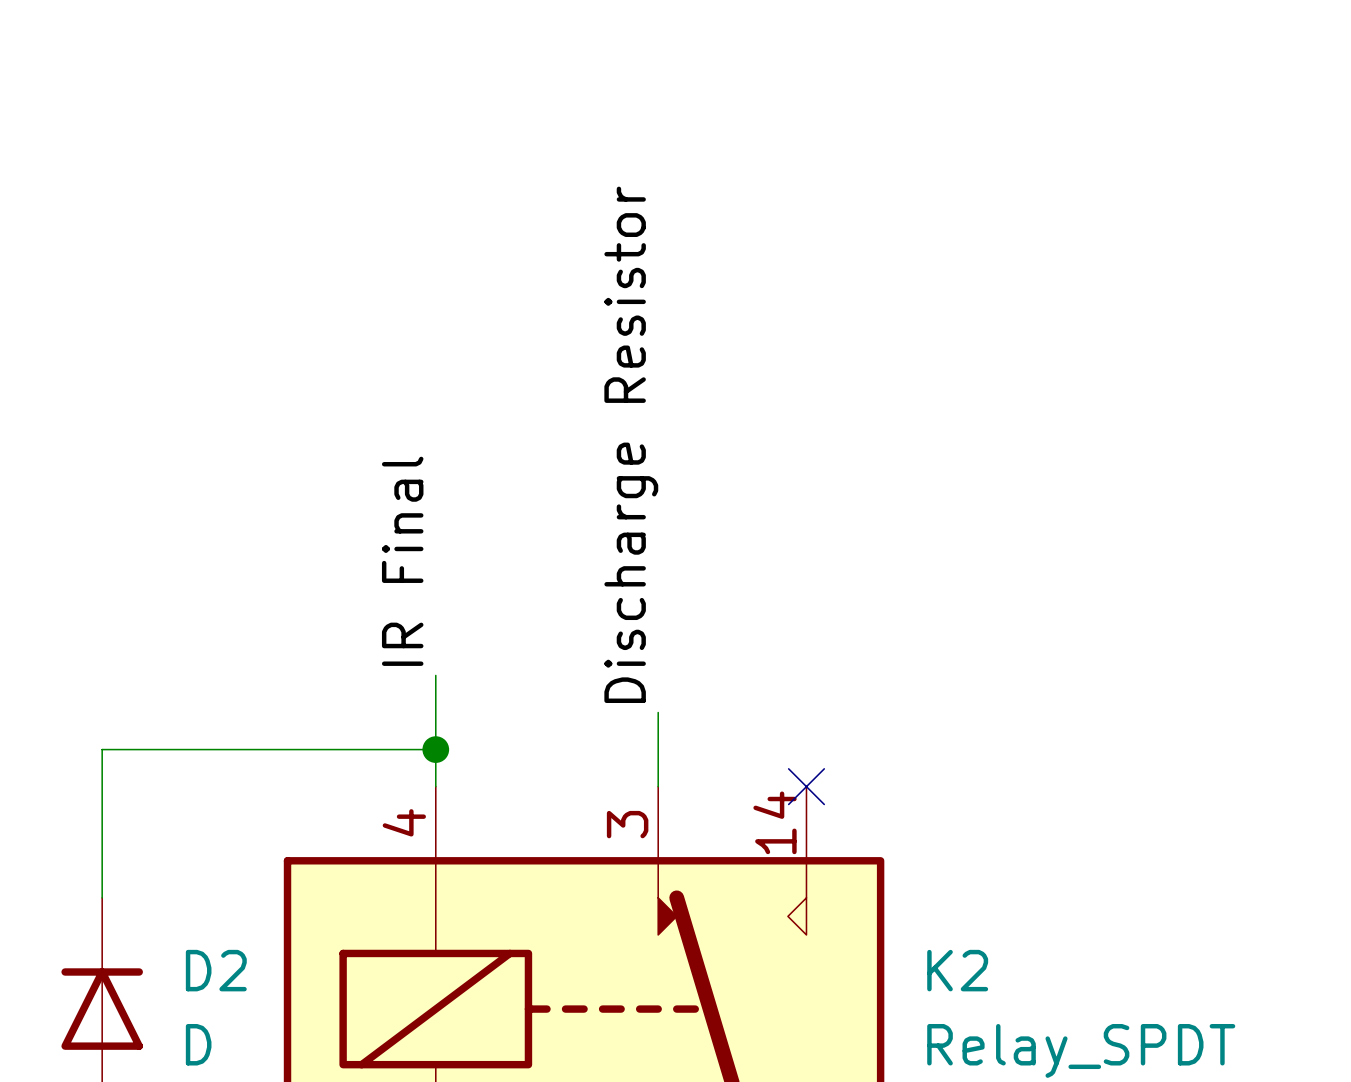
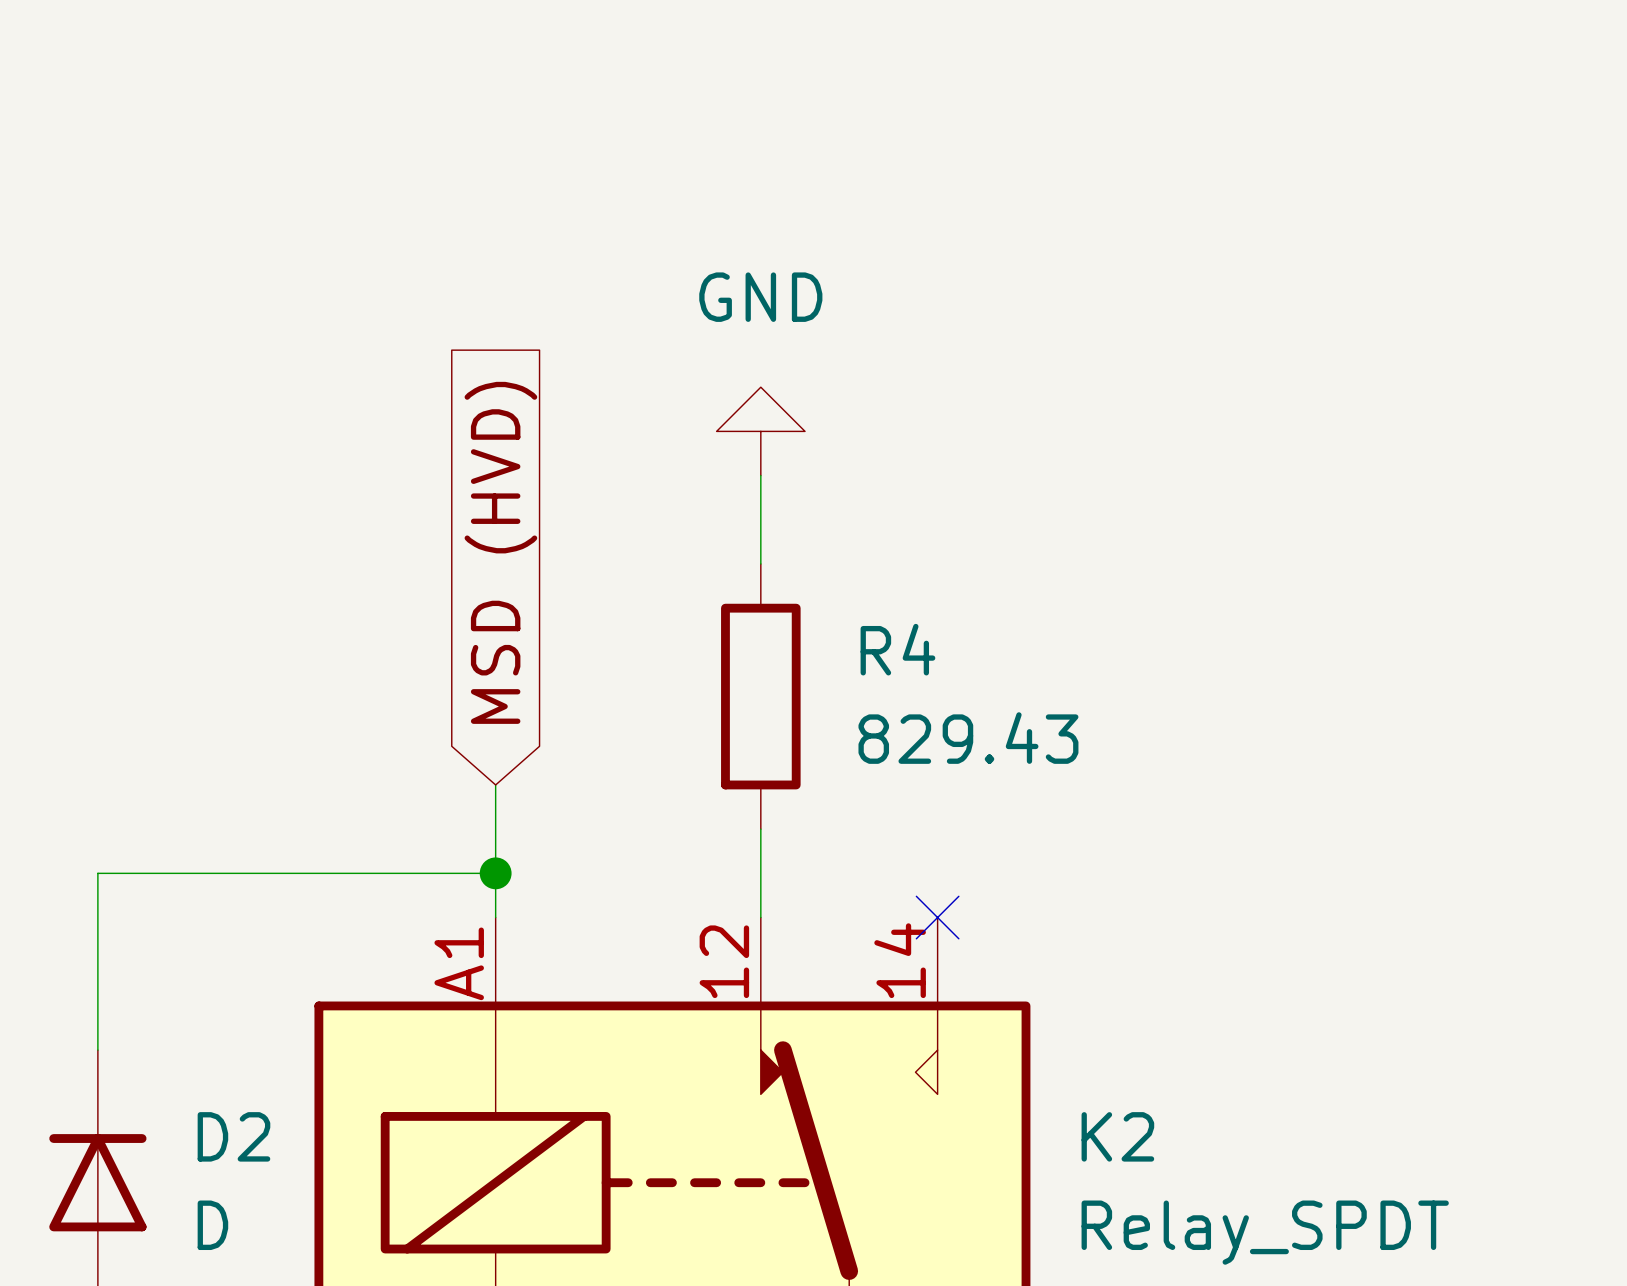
power symbol: none -> GND (760, 431)
wire: none -> (760, 475) (760, 563)
label: Discharge Resistor (631, 444) -> none
global label: none -> MSD (HVD) (500, 552)
label: IR Final (402, 561) -> none
R4: none -> 829.43 (760, 696)
K2 pin number: 4 (404, 822) -> A1 (459, 963)
K2 pin number: 3 (627, 824) -> 12 (724, 961)

